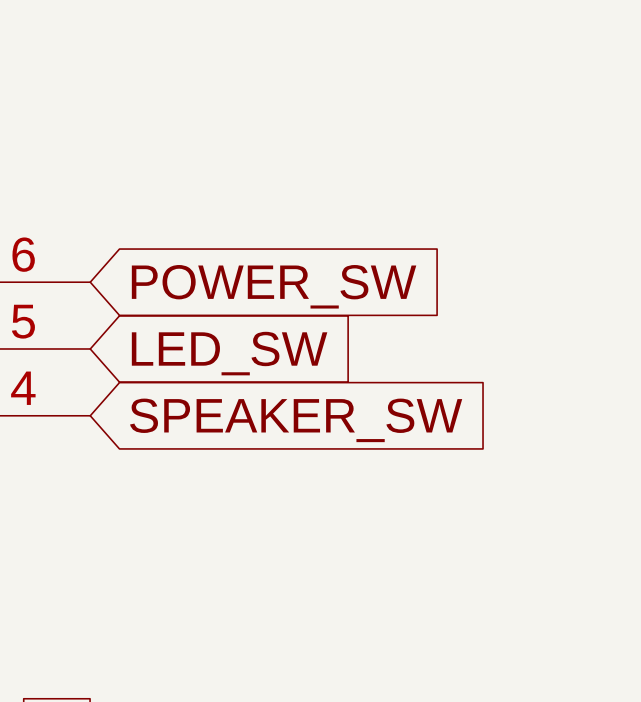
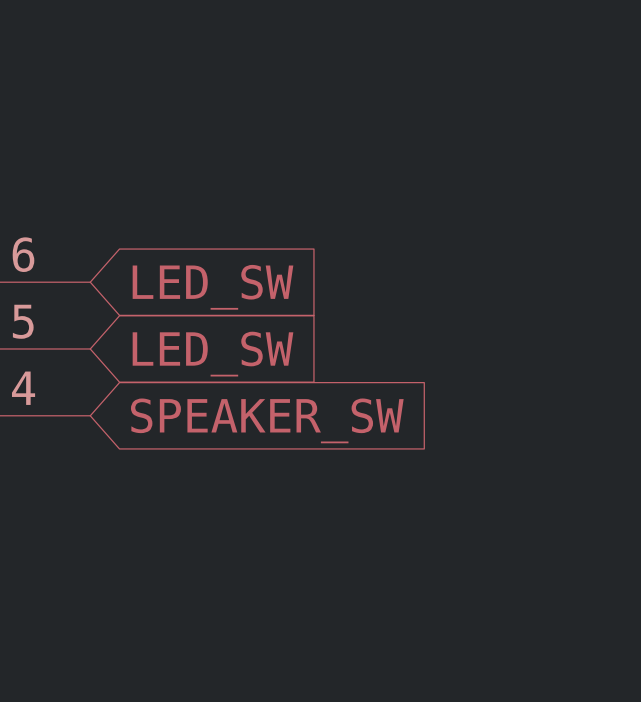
global label: POWER_SW (274, 286) -> LED_SW (212, 287)

